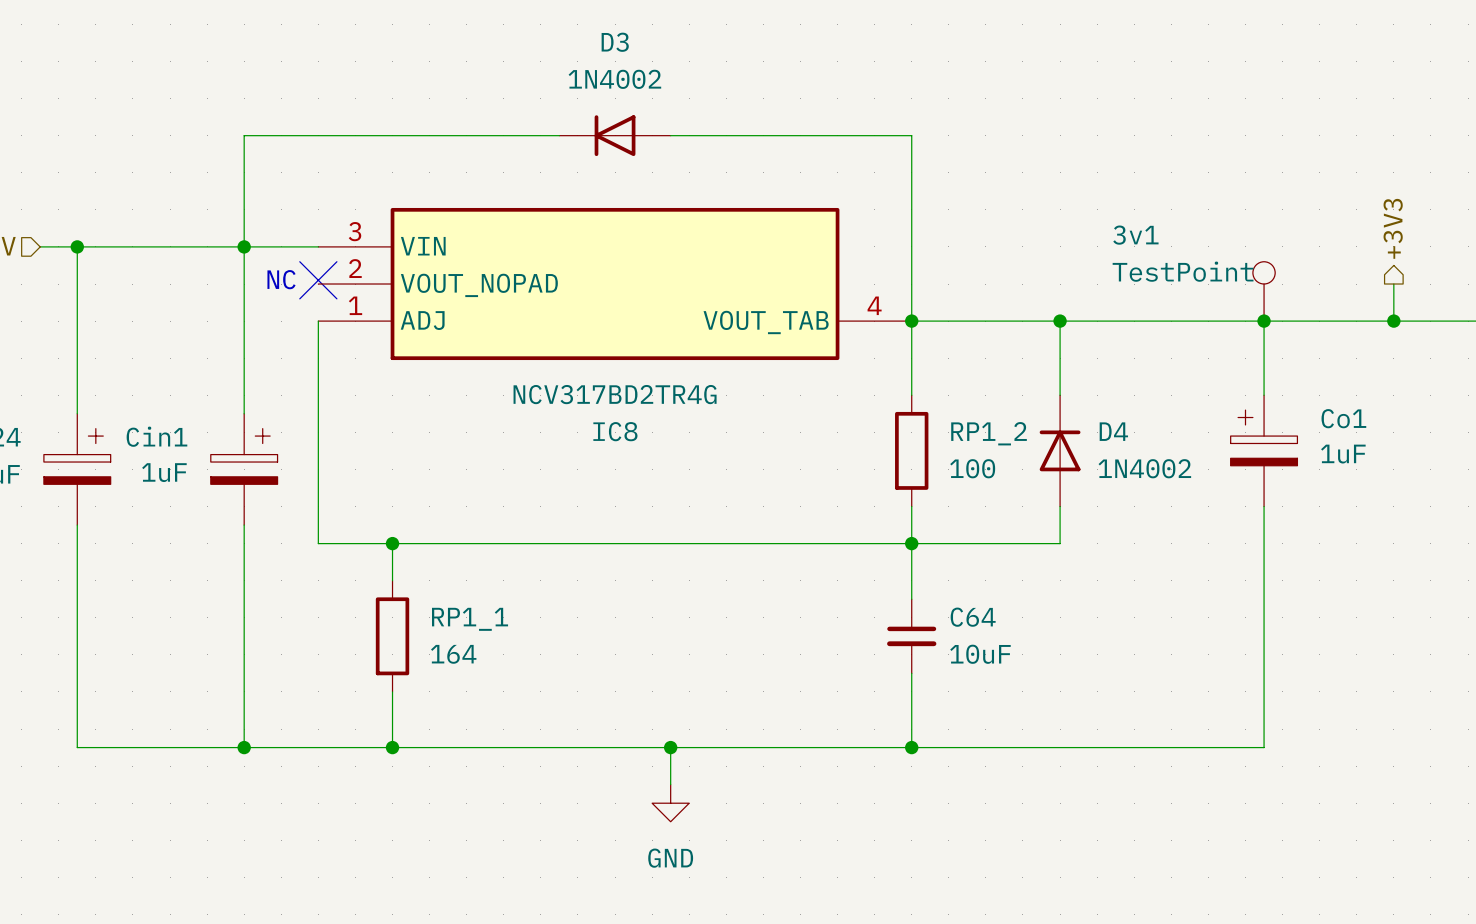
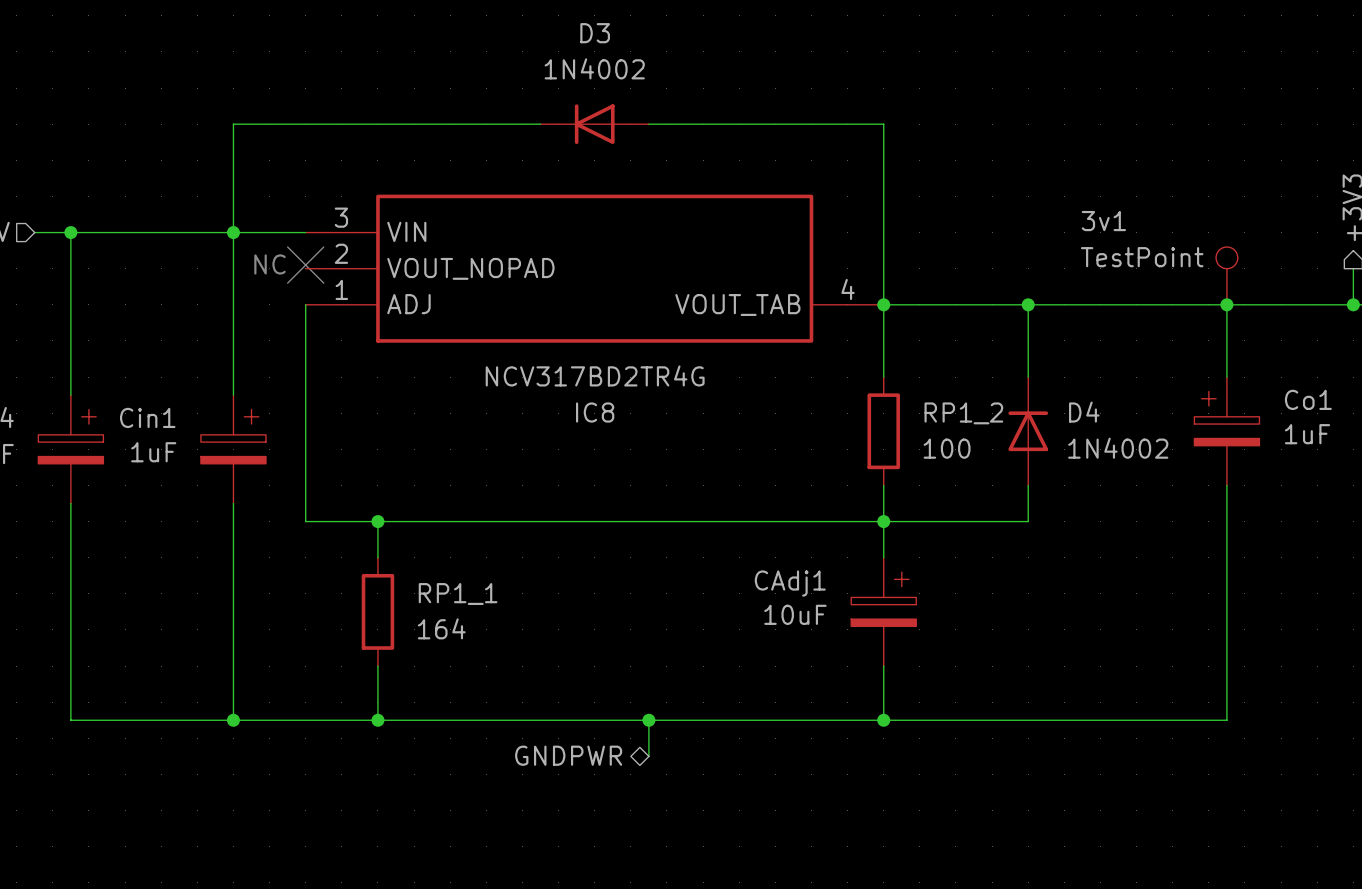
C64: 10uF (911, 636) -> none
CAdj1: none -> 10uF (883, 611)
hierarchical label: none -> GNDPWR (568, 755)
power symbol: GND (670, 803) -> none

